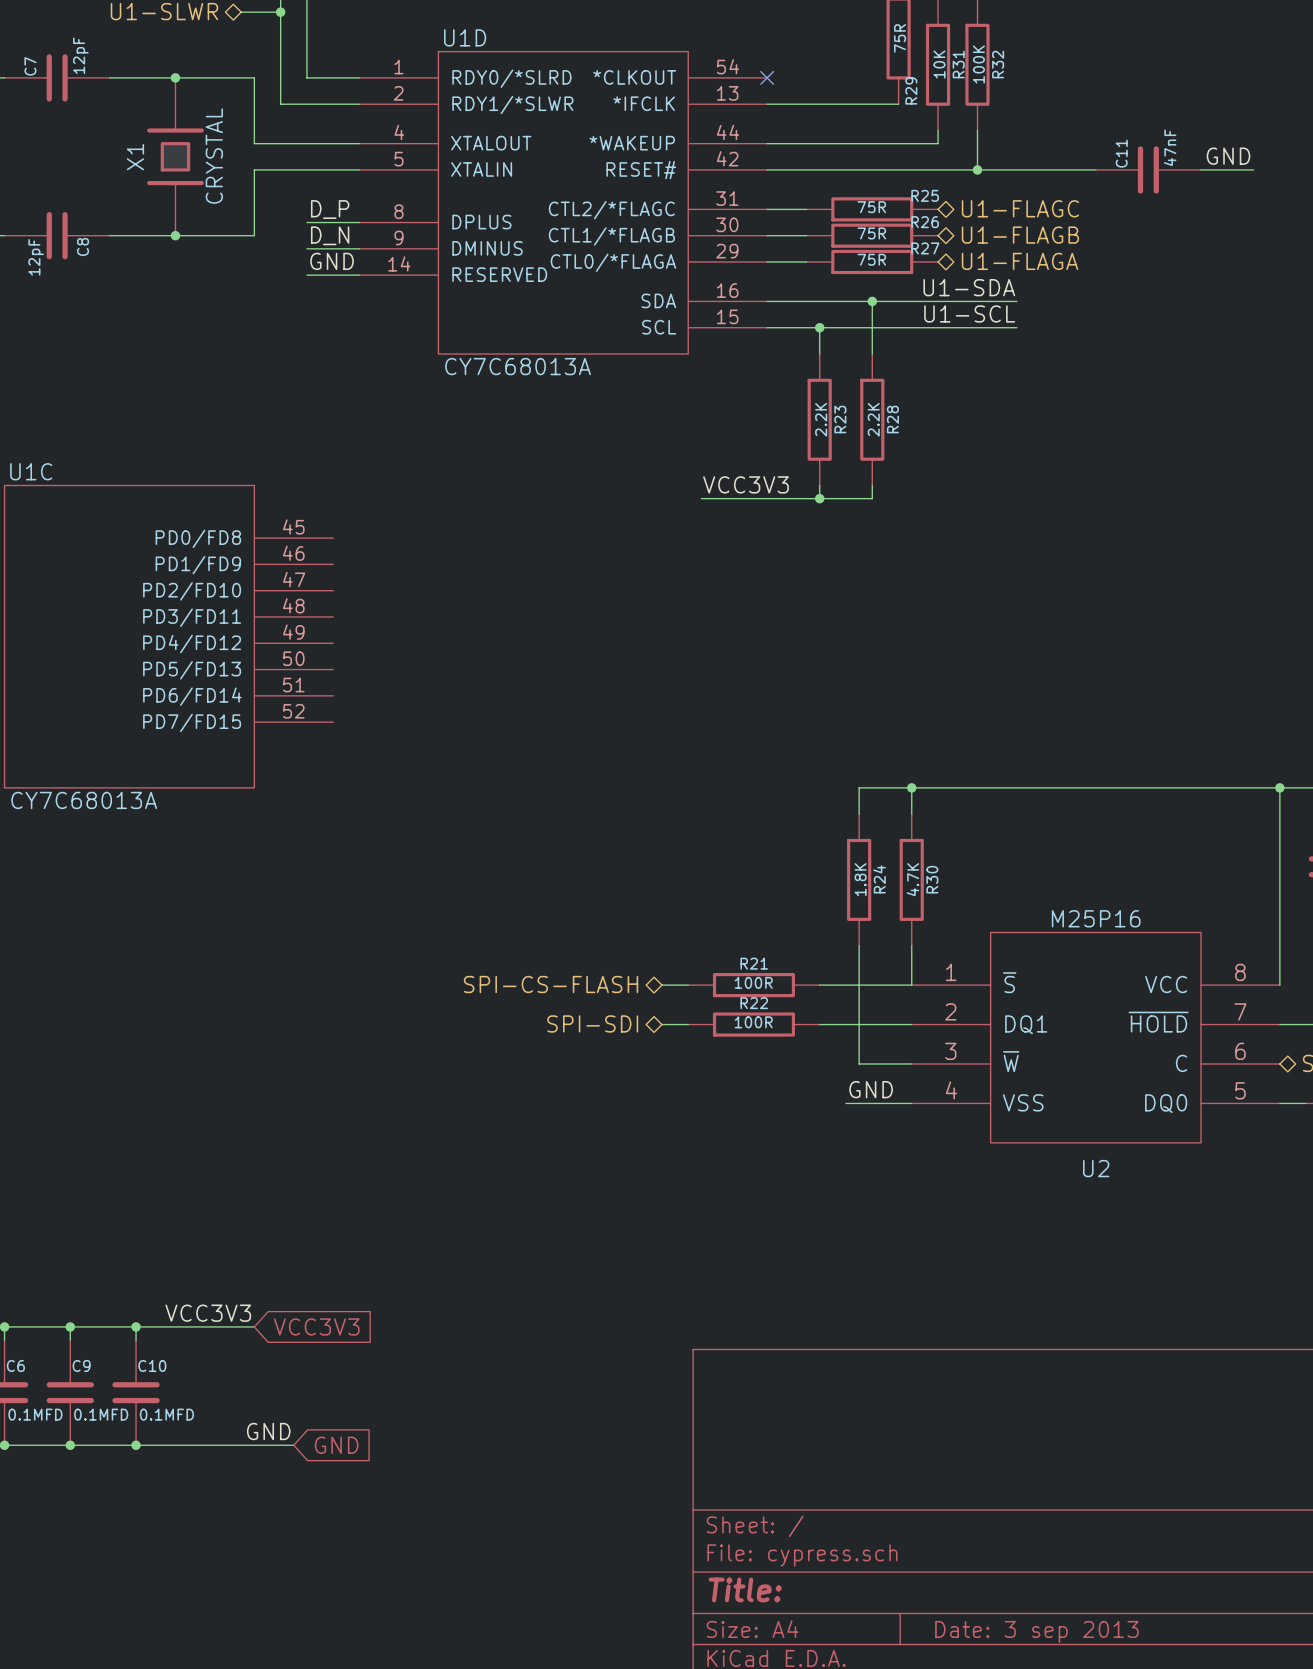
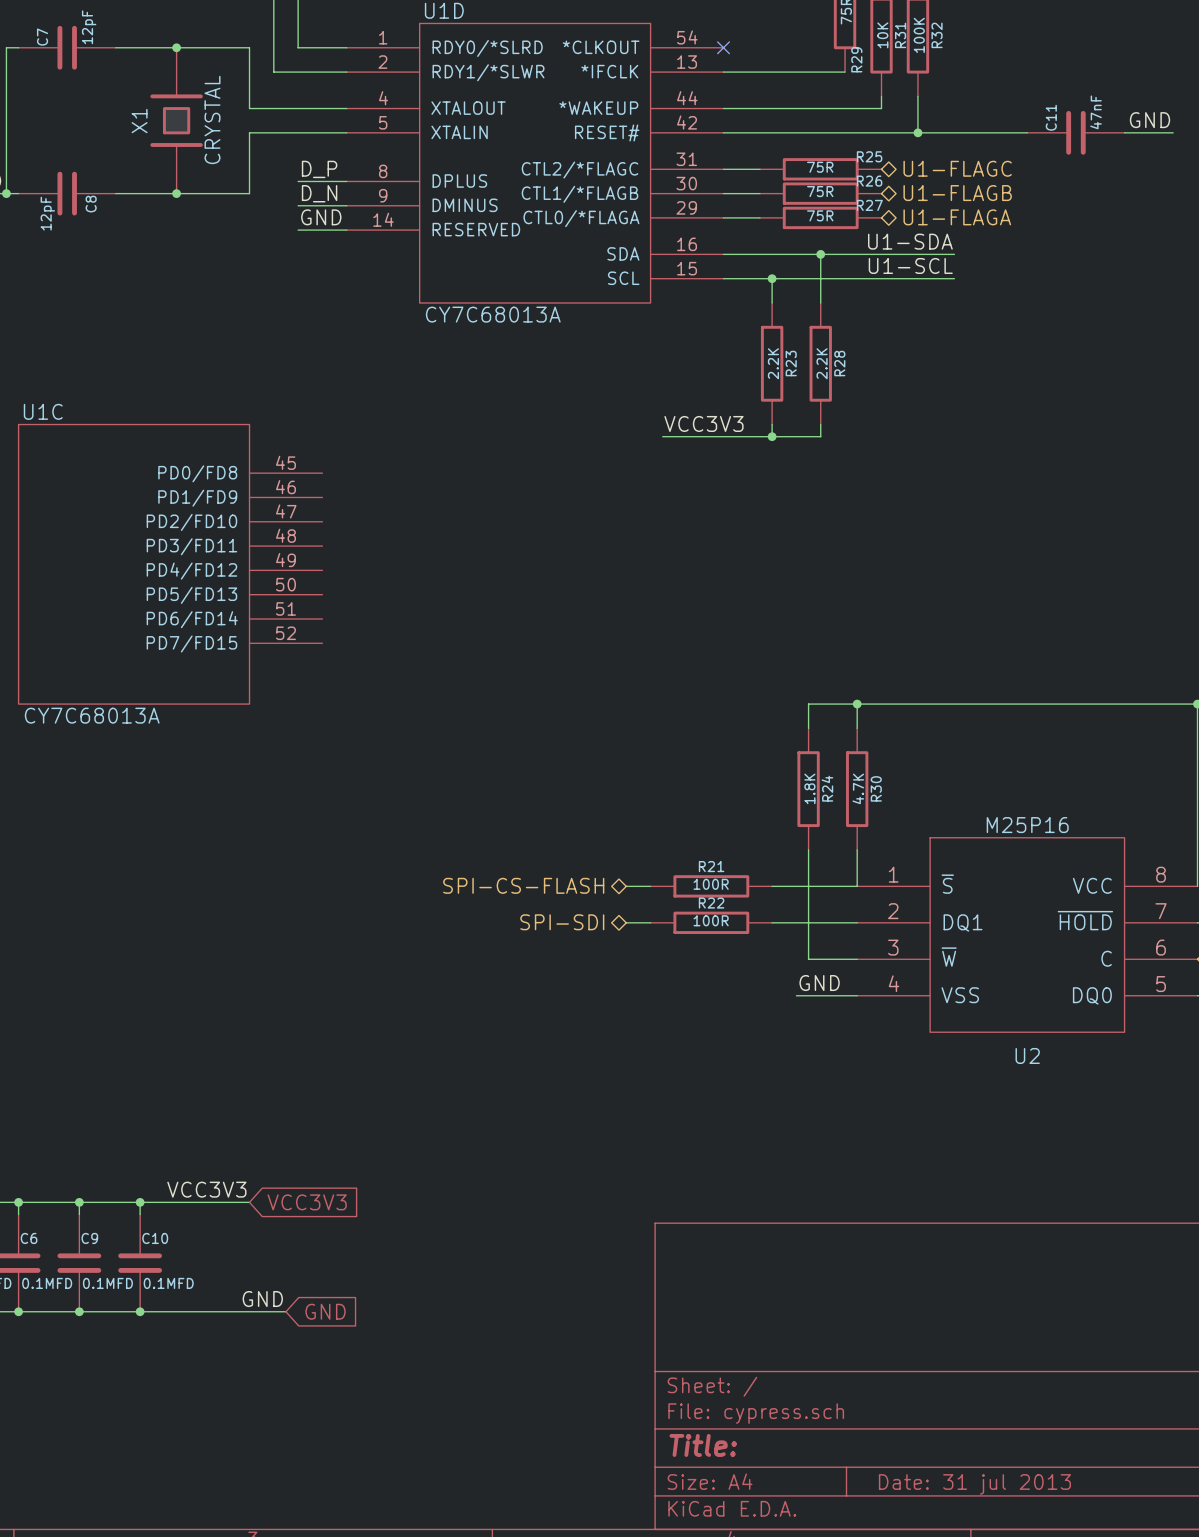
title block: Date: 3 sep 2013 (1036, 1632) -> Date: 31 jul 2013 (974, 1484)

